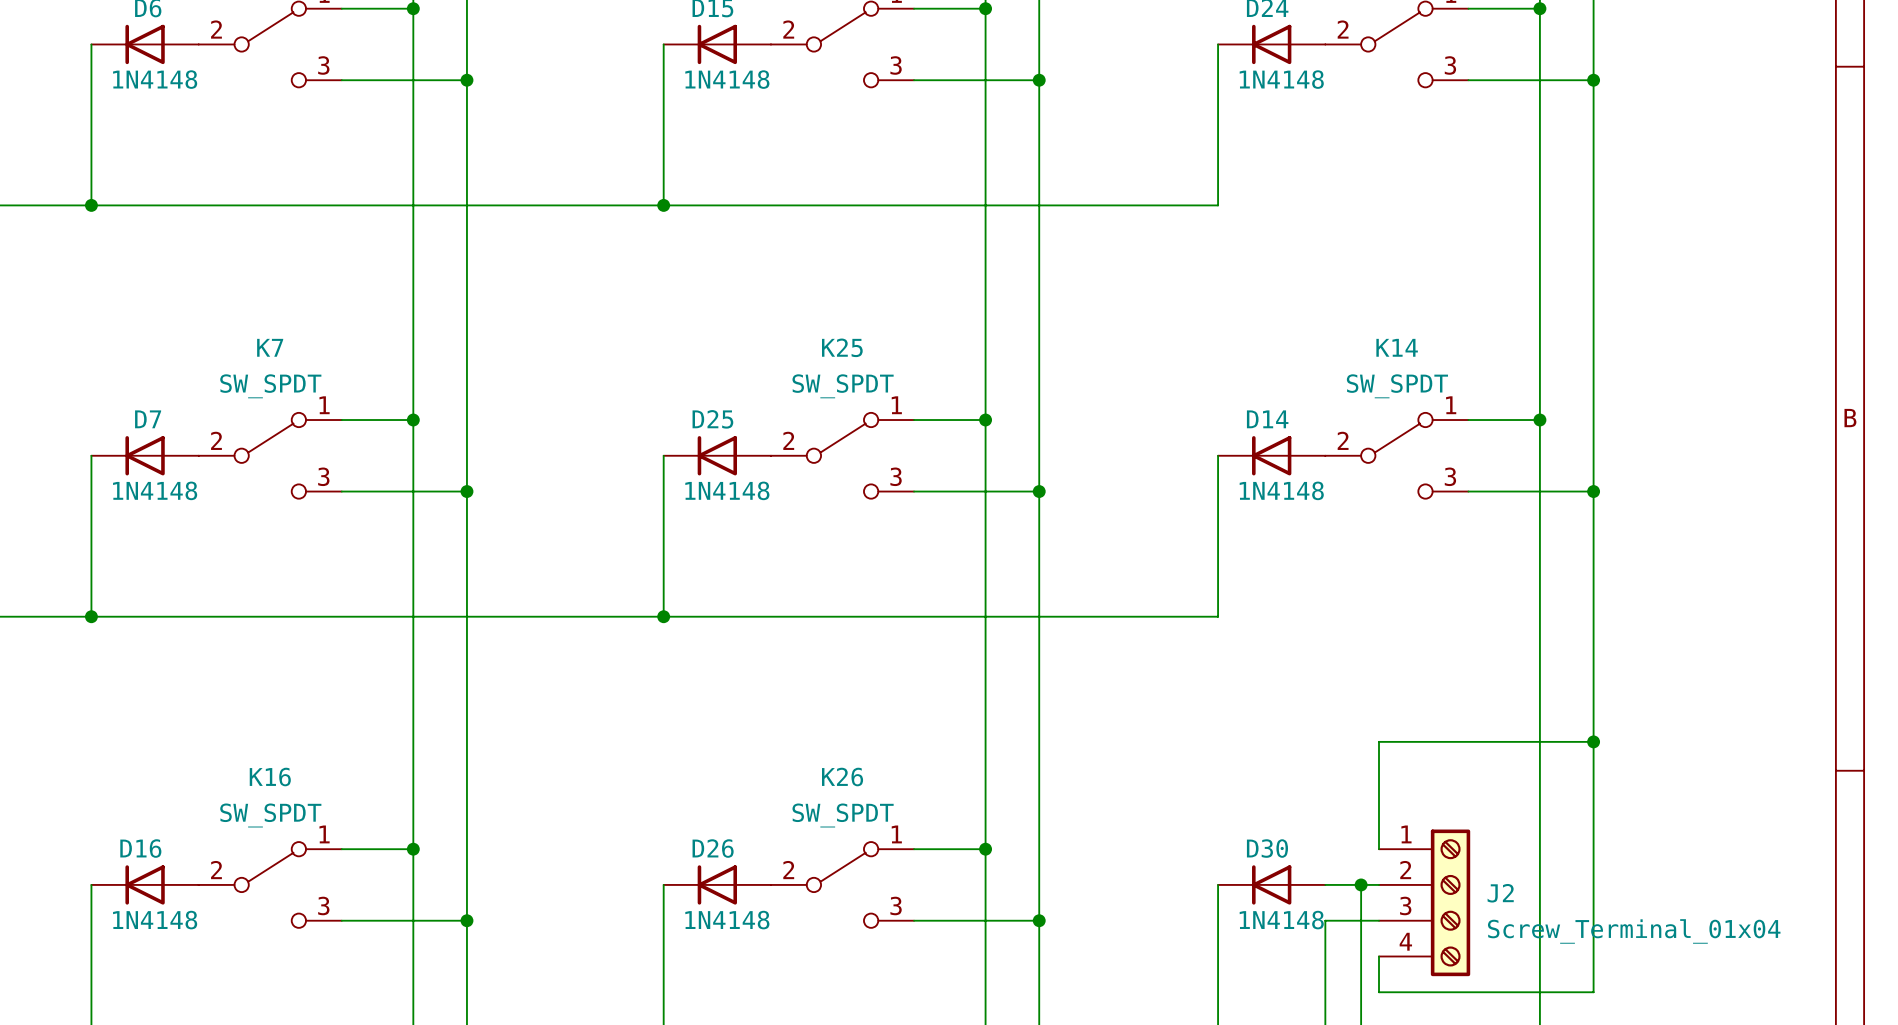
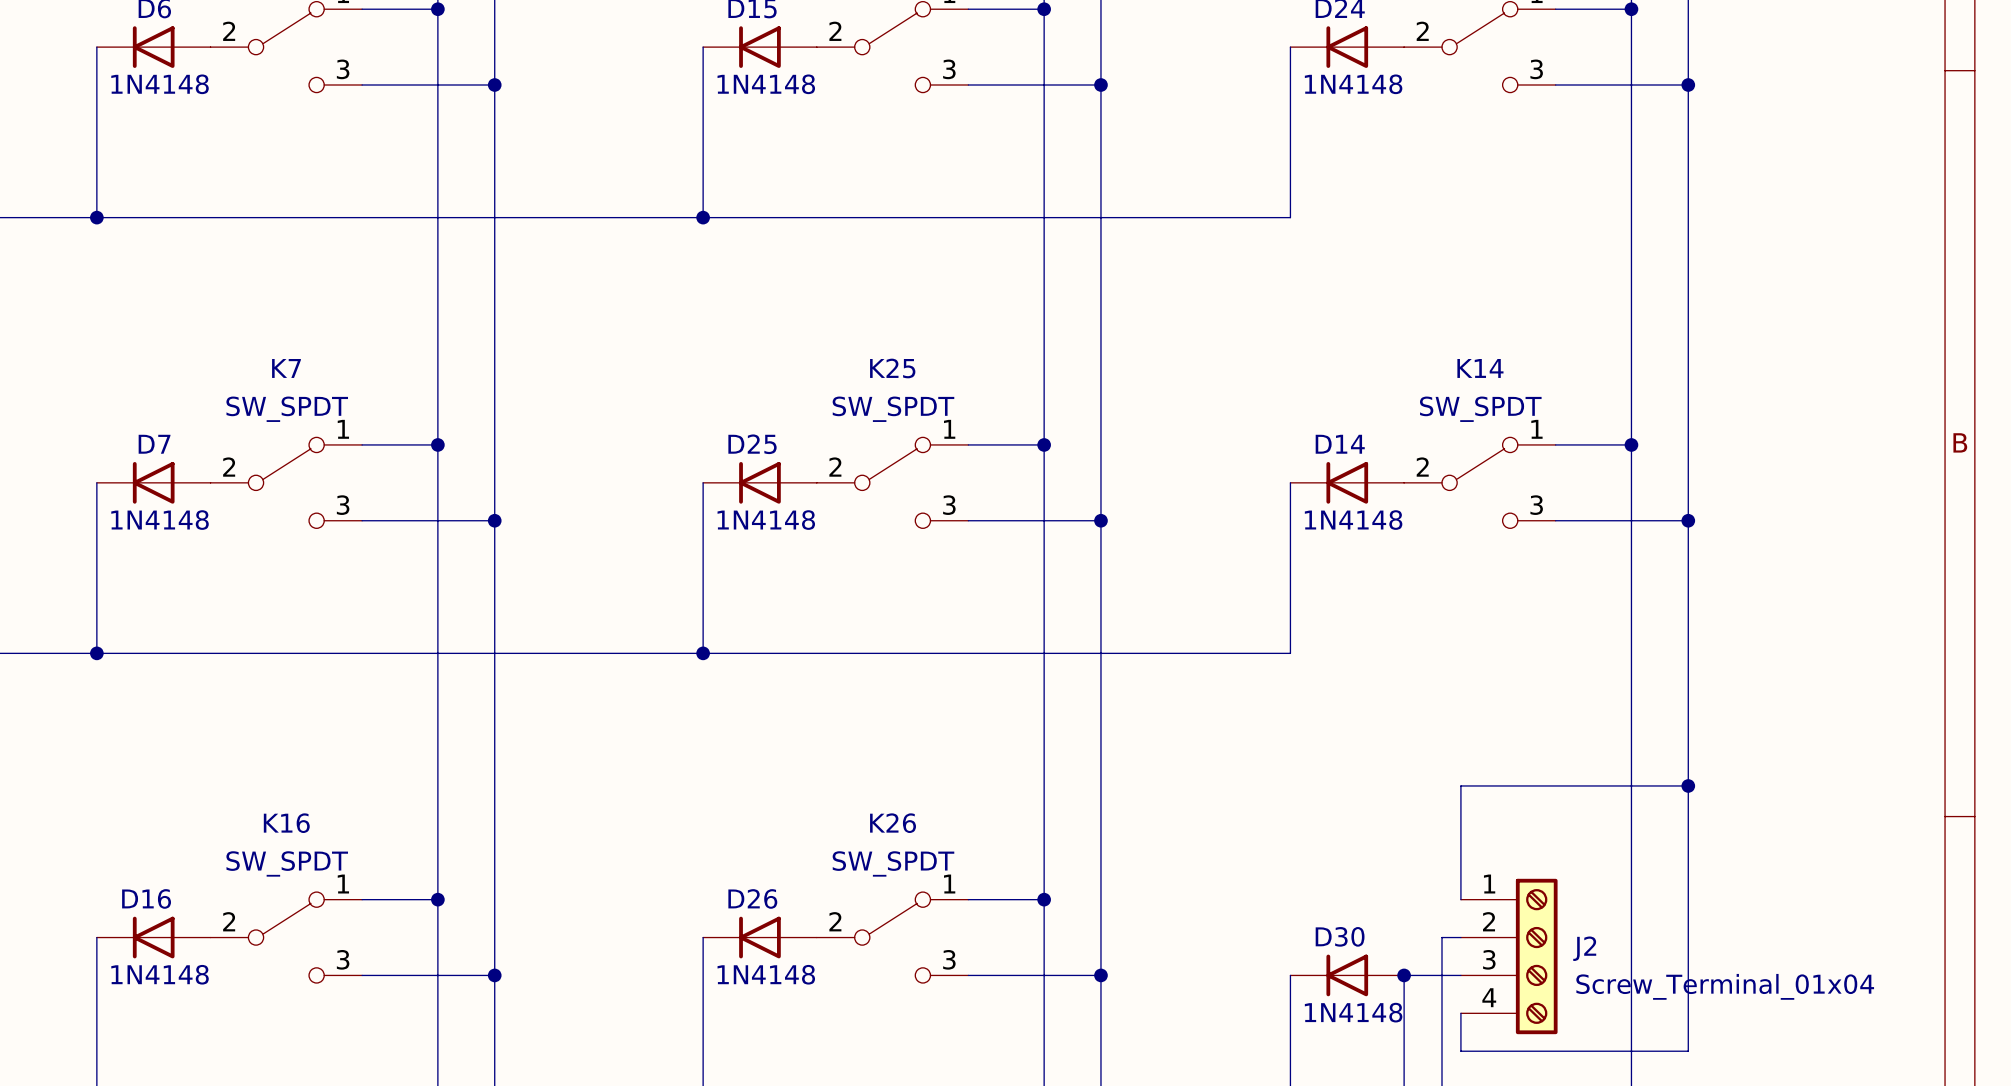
wire: (1218, 884) (1218, 920) -> none
D30 position: (1271, 884) -> (1347, 975)
wire: (1325, 884) (1361, 884) -> none
junction position: (1361, 884) -> (1404, 975)

